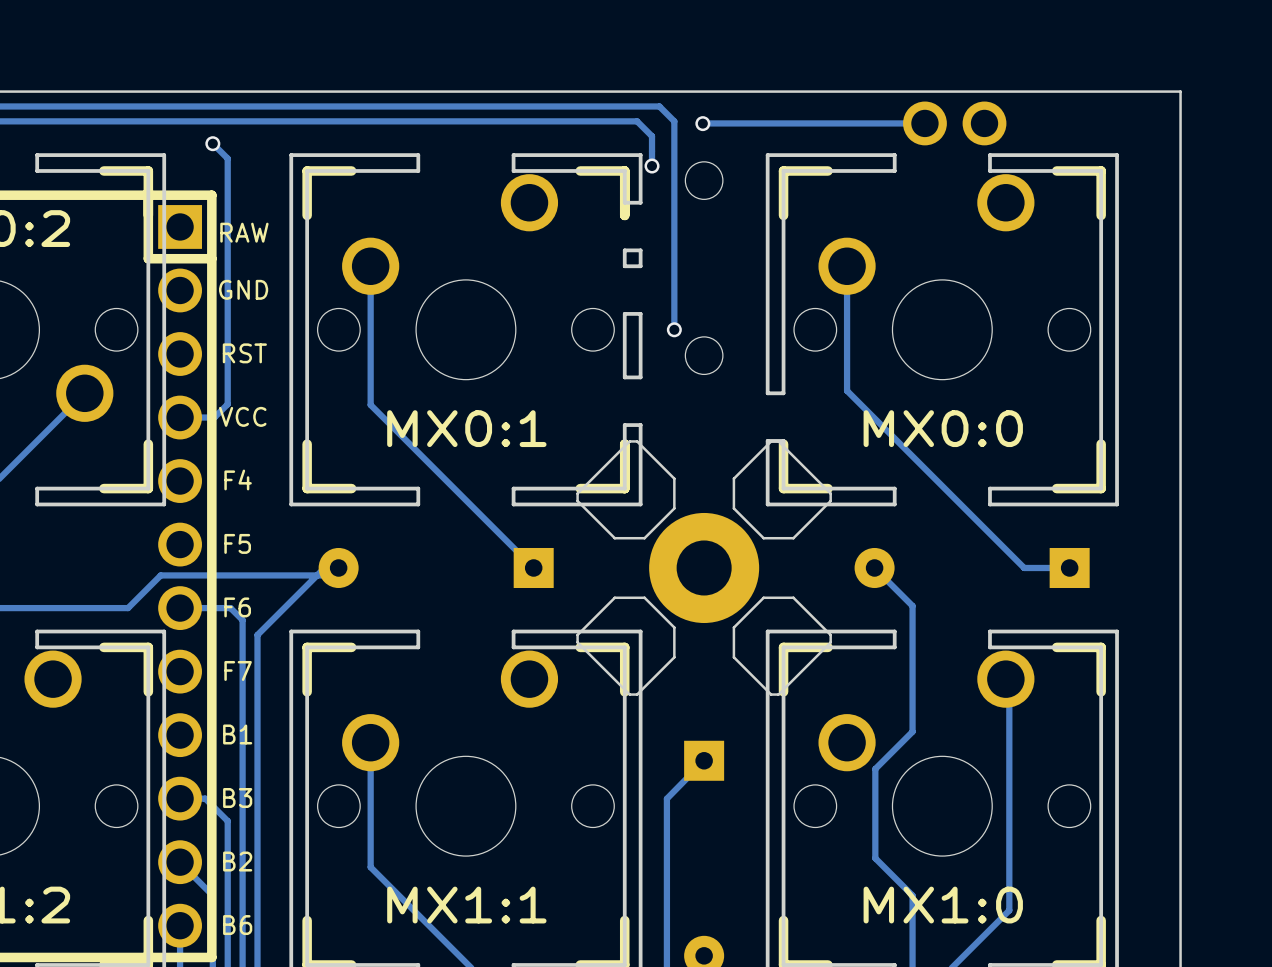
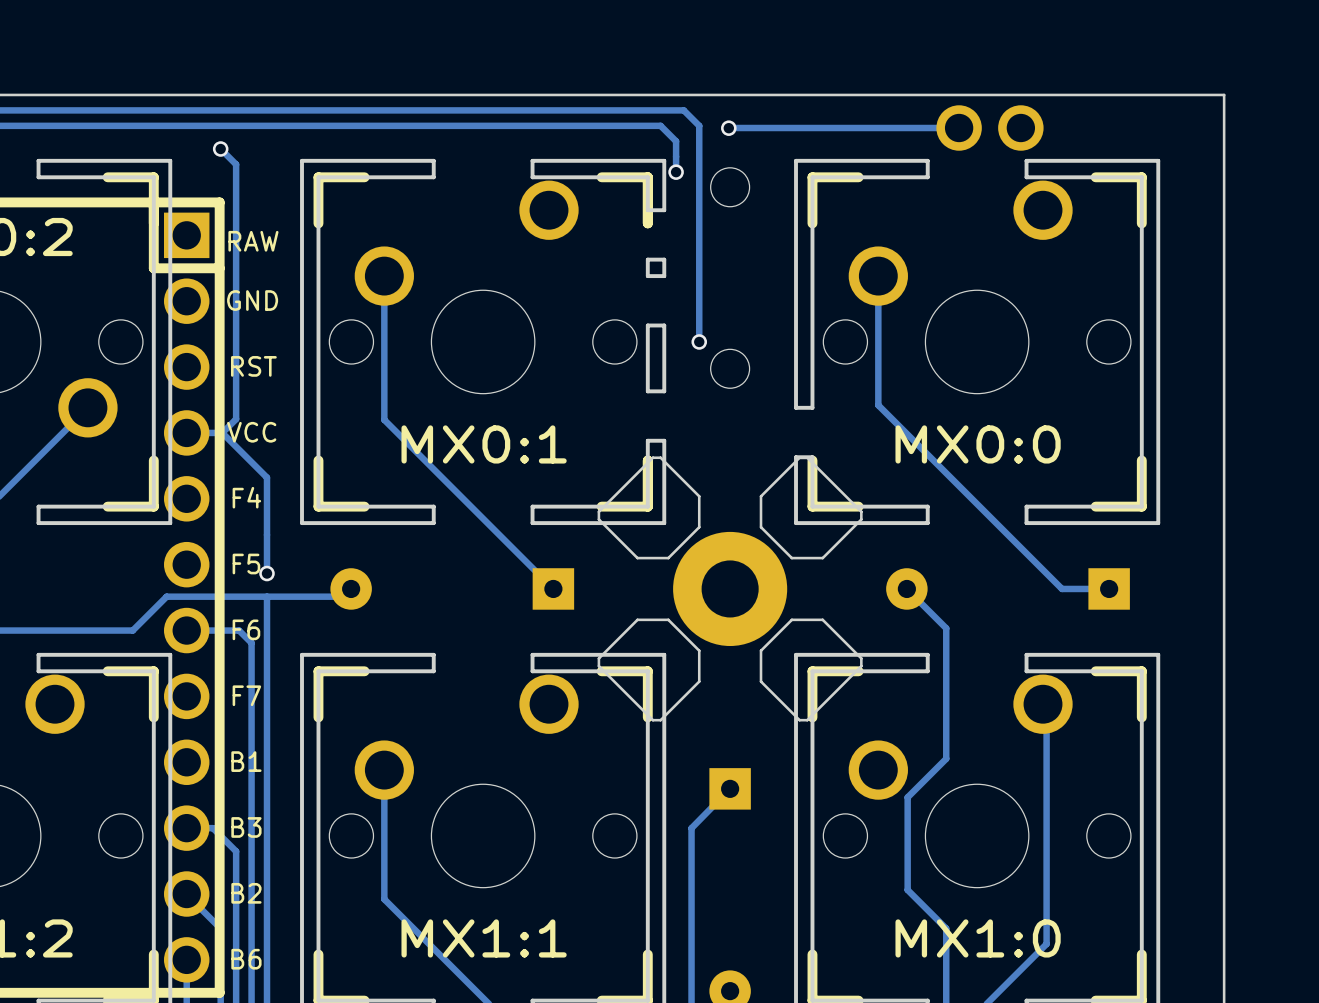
track: none -> (222, 432) (267, 477) (267, 573)
via: none -> (267, 573)
track: (338, 567) (324, 567) (257, 634) -> (267, 596) (267, 658)

